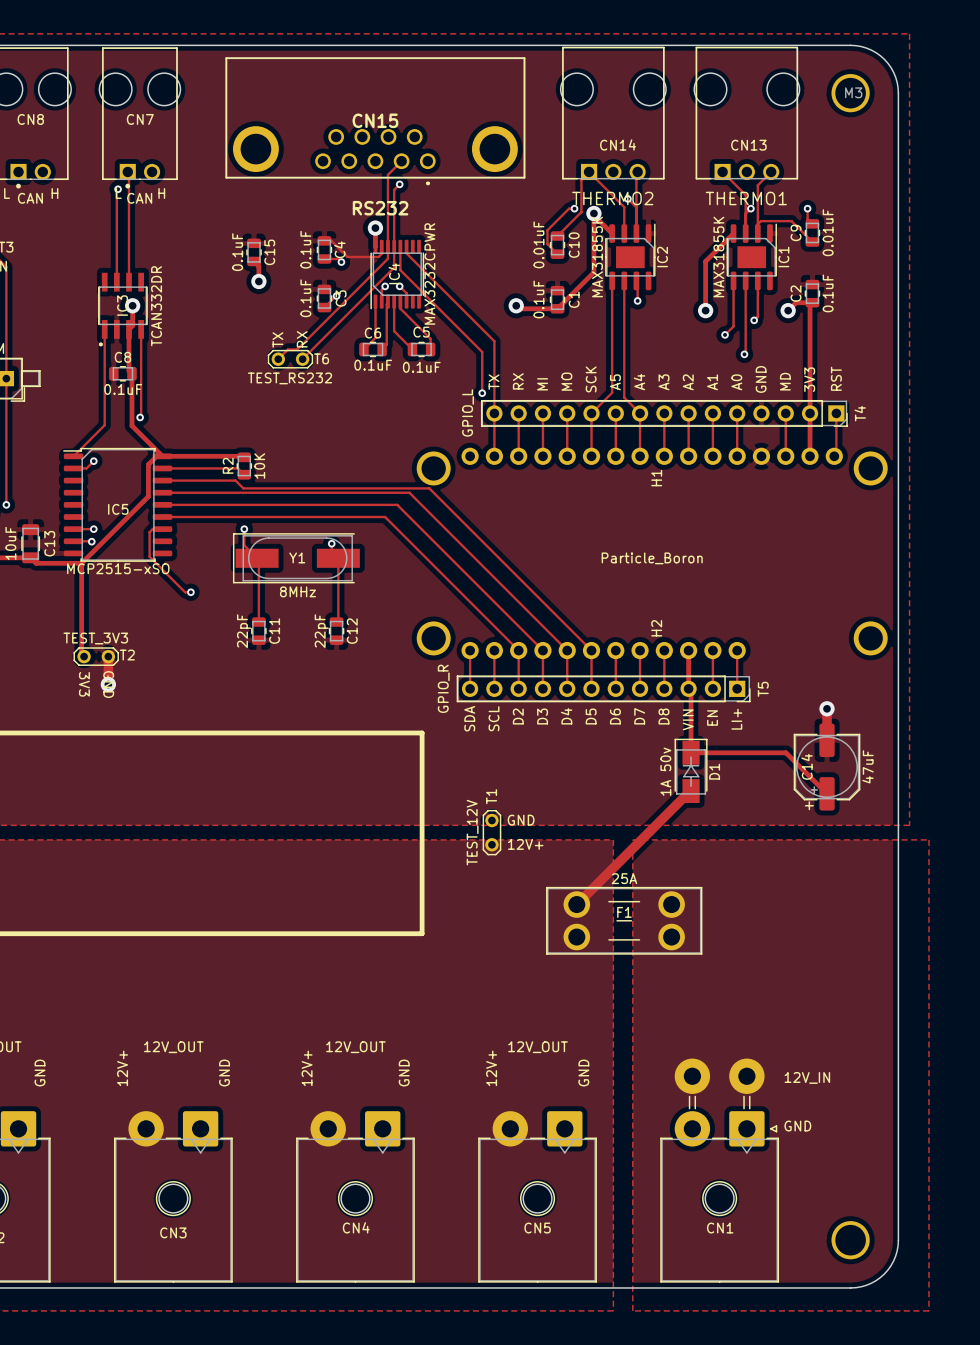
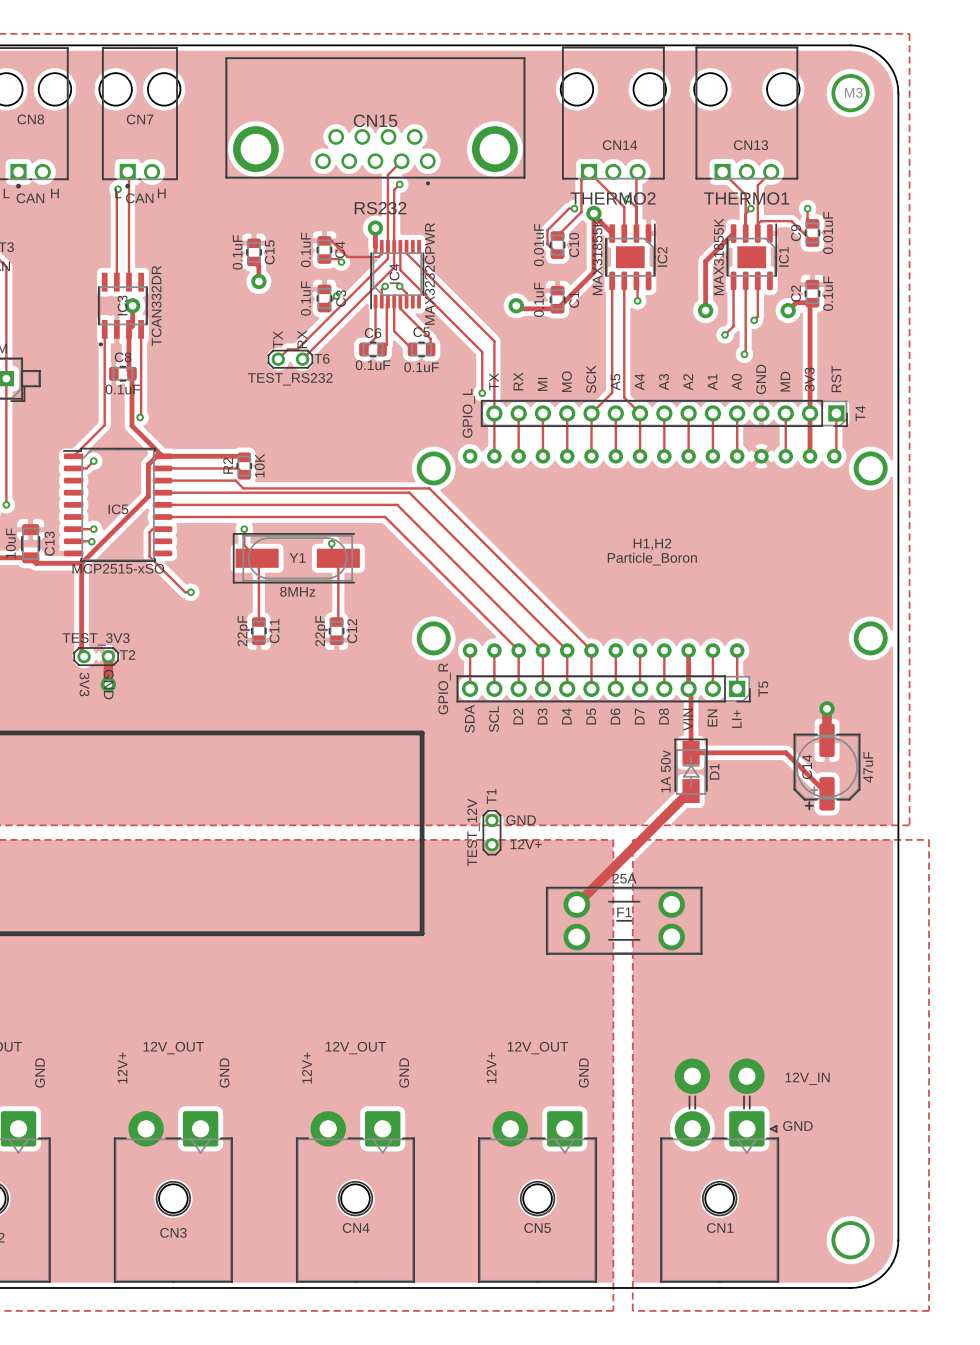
H2 H1: Particle_Boron (652, 553) -> none
H1,H2: none -> Particle_Boron (652, 553)

